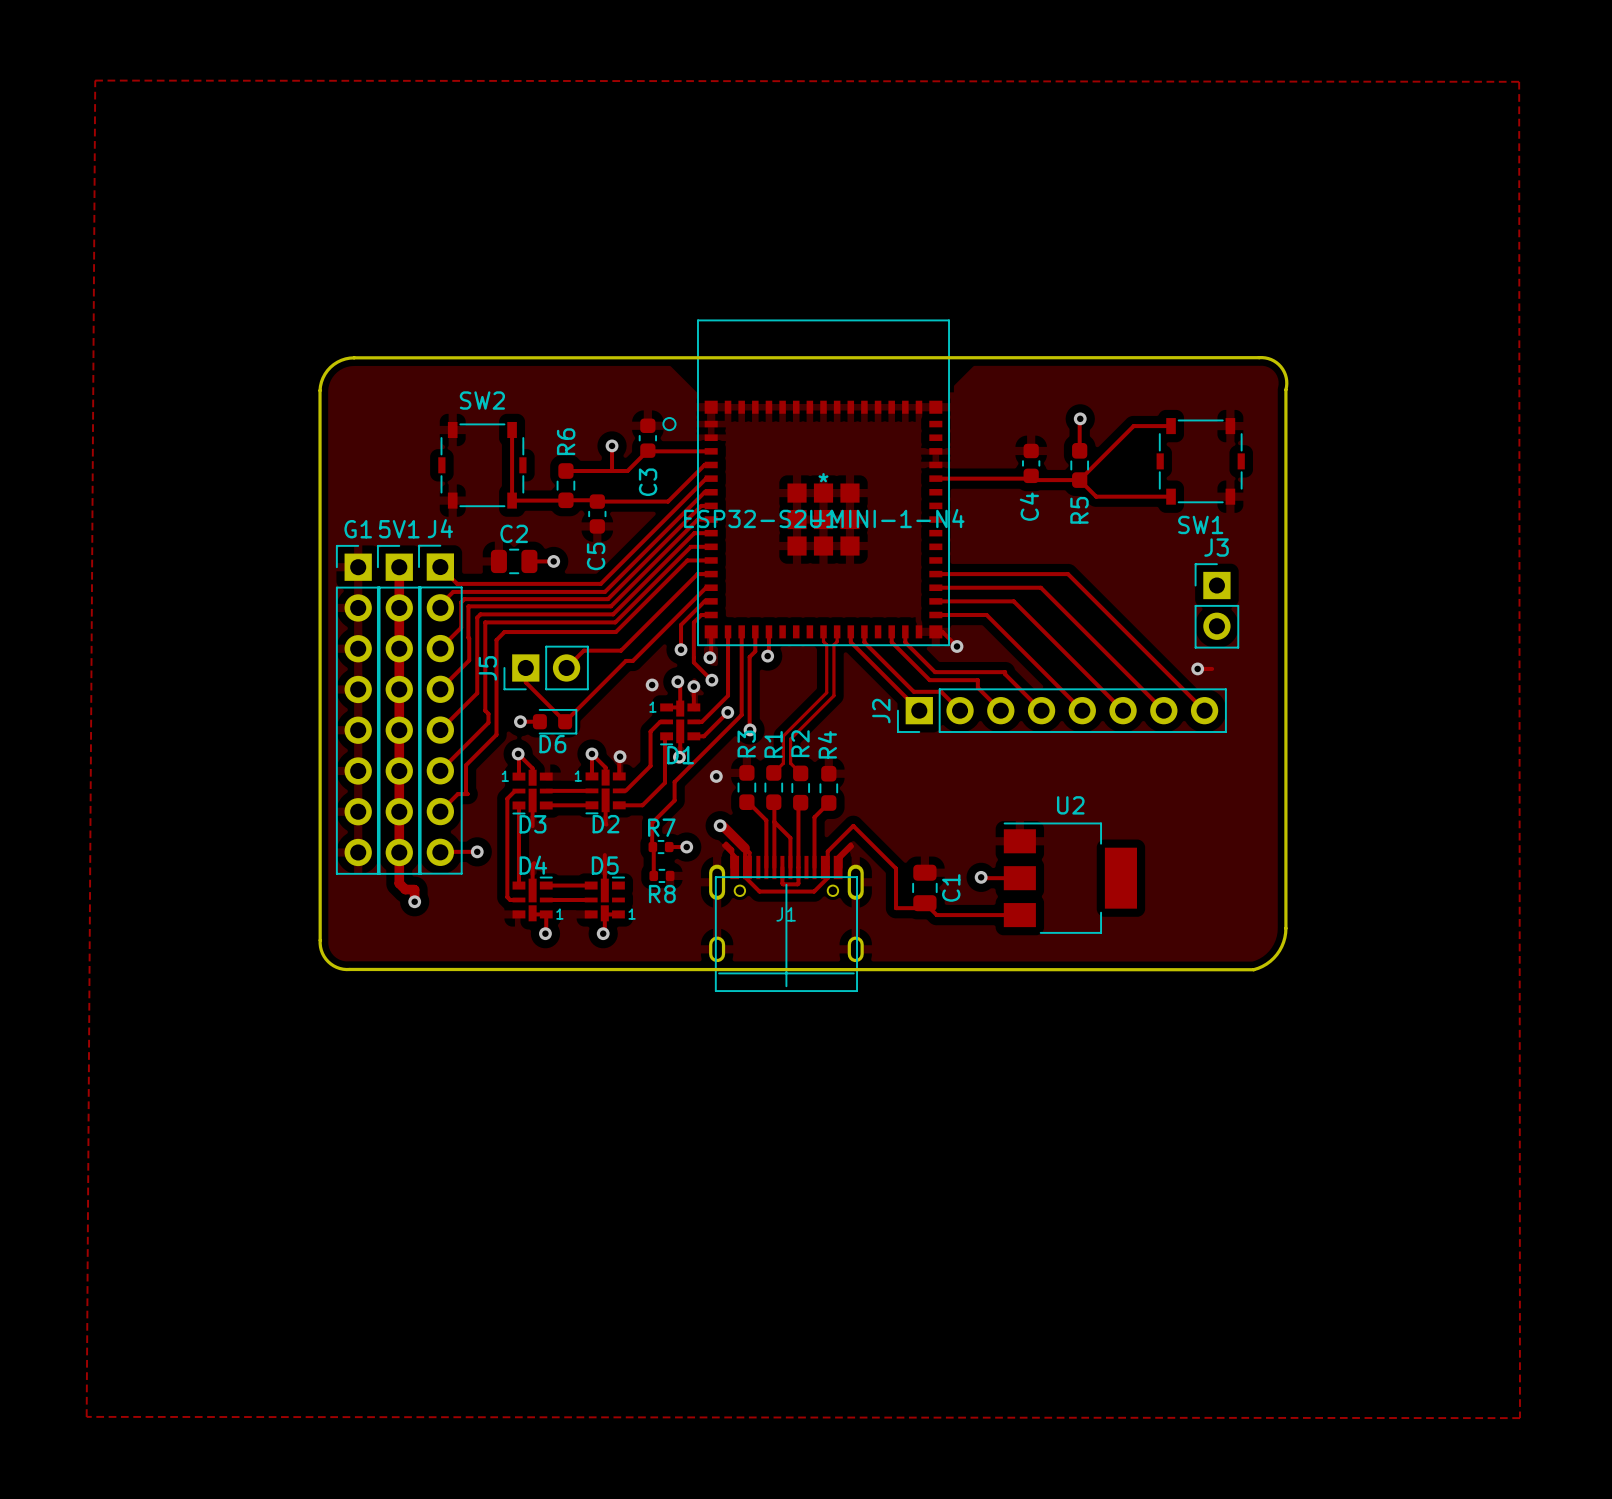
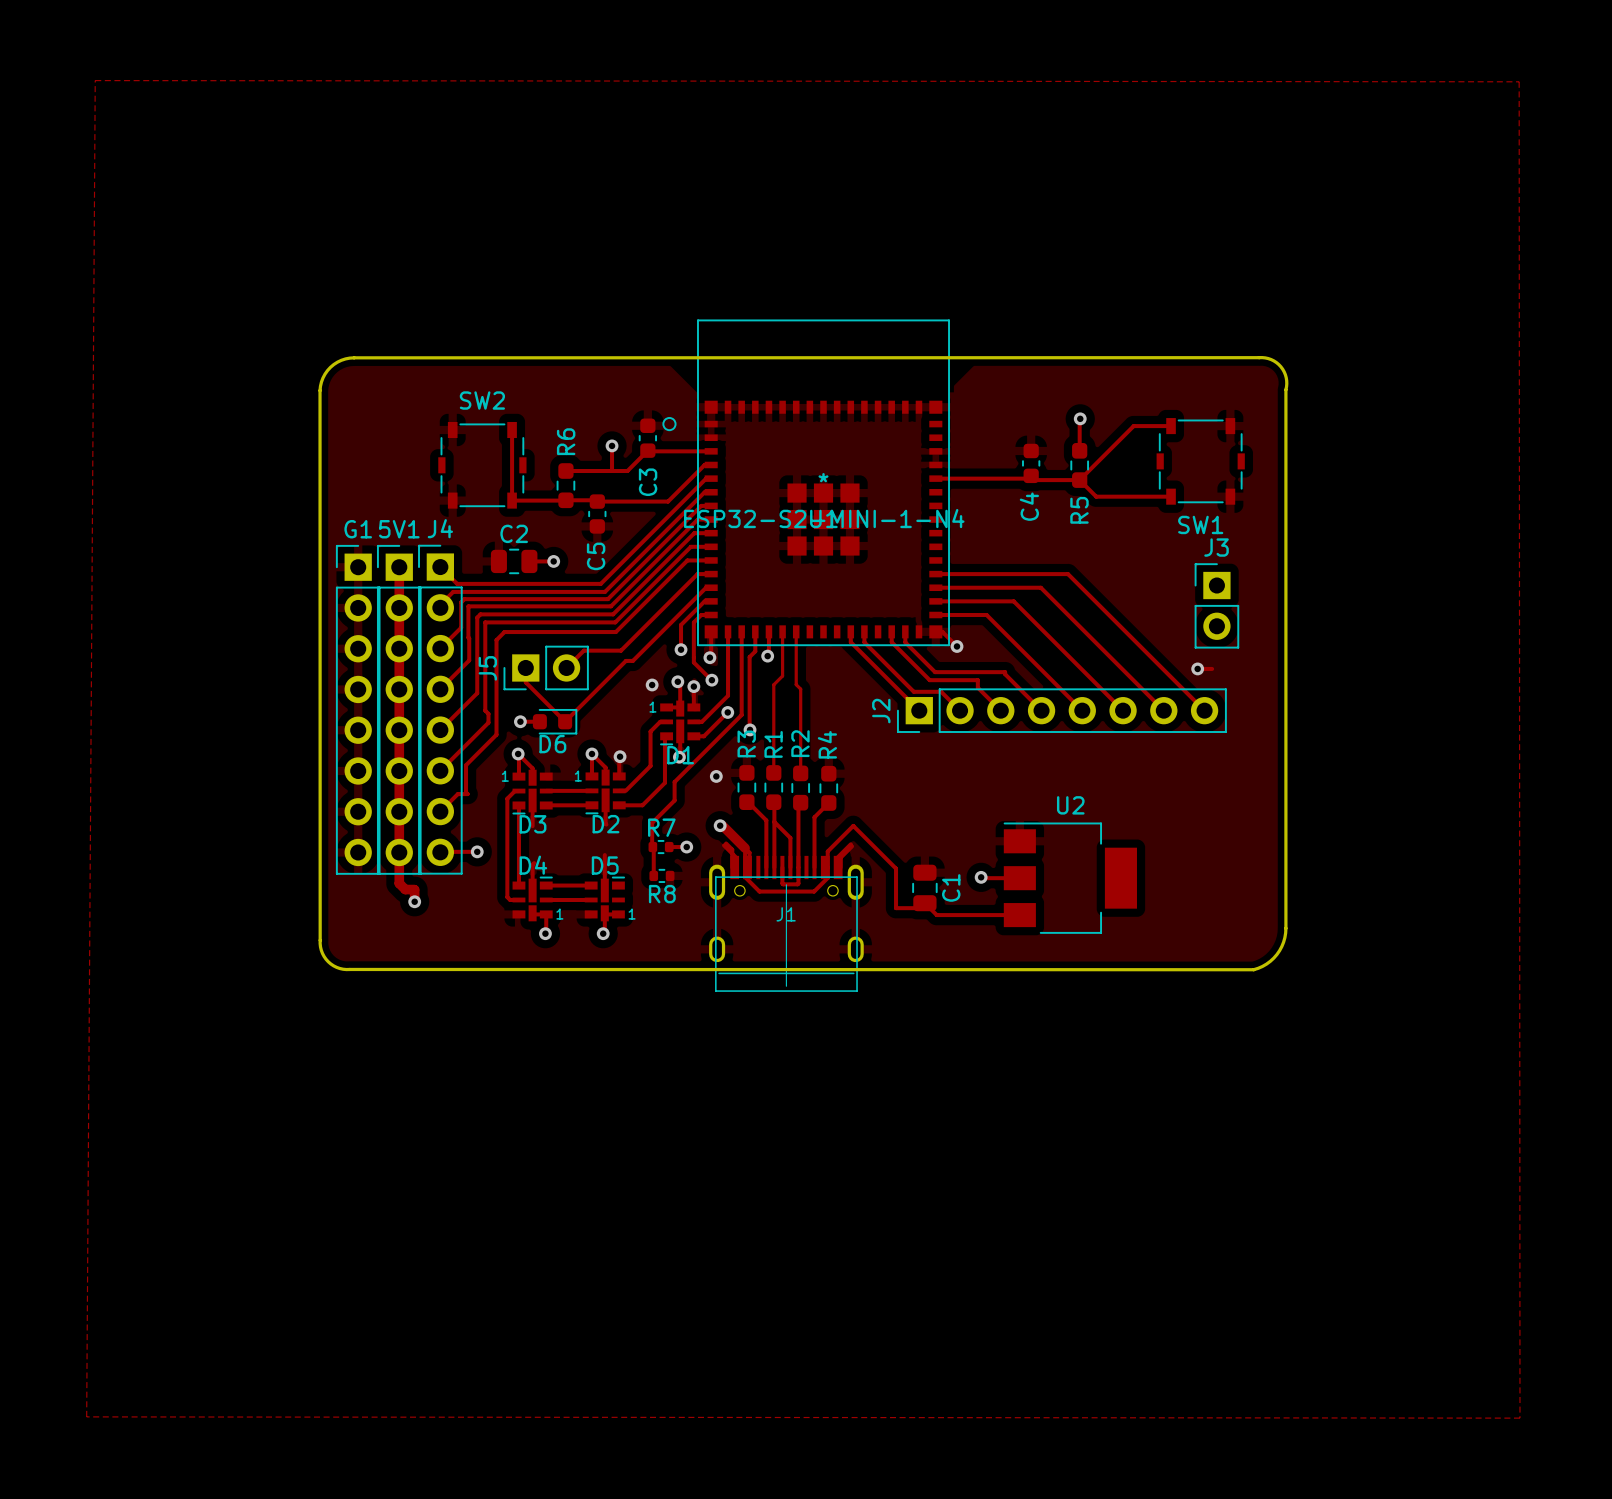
track: (823, 631) (823, 641) (826, 644) (826, 692) (783, 736) (783, 763) (773, 772) -> (782, 631) (782, 676) (773, 684) (773, 772)
track: (837, 631) (837, 641) (833, 644) (833, 695) (790, 739) (790, 763) (800, 773) -> (796, 631) (796, 684) (800, 689) (800, 773)

